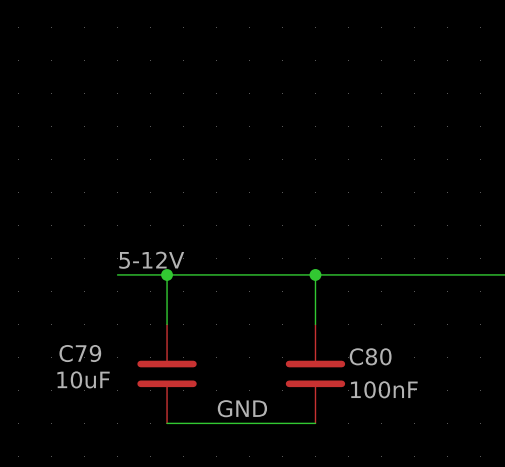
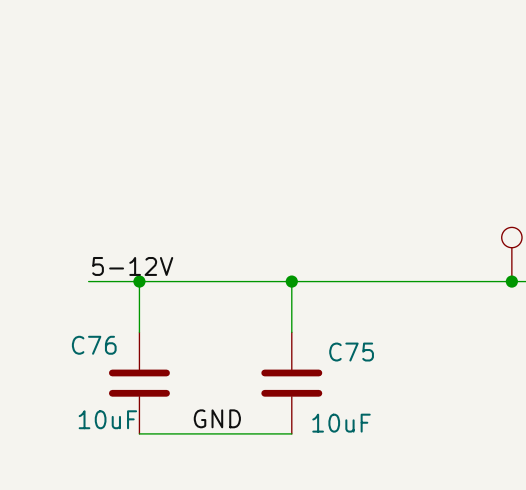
C79 name: C79 (80, 353) -> C76 (94, 345)
C80 name: C80 (370, 356) -> C75 (351, 352)
C79 value position: 10uF (83, 379) -> 10uF (107, 419)
C80 value: 100nF (384, 389) -> 10uF (341, 423)

